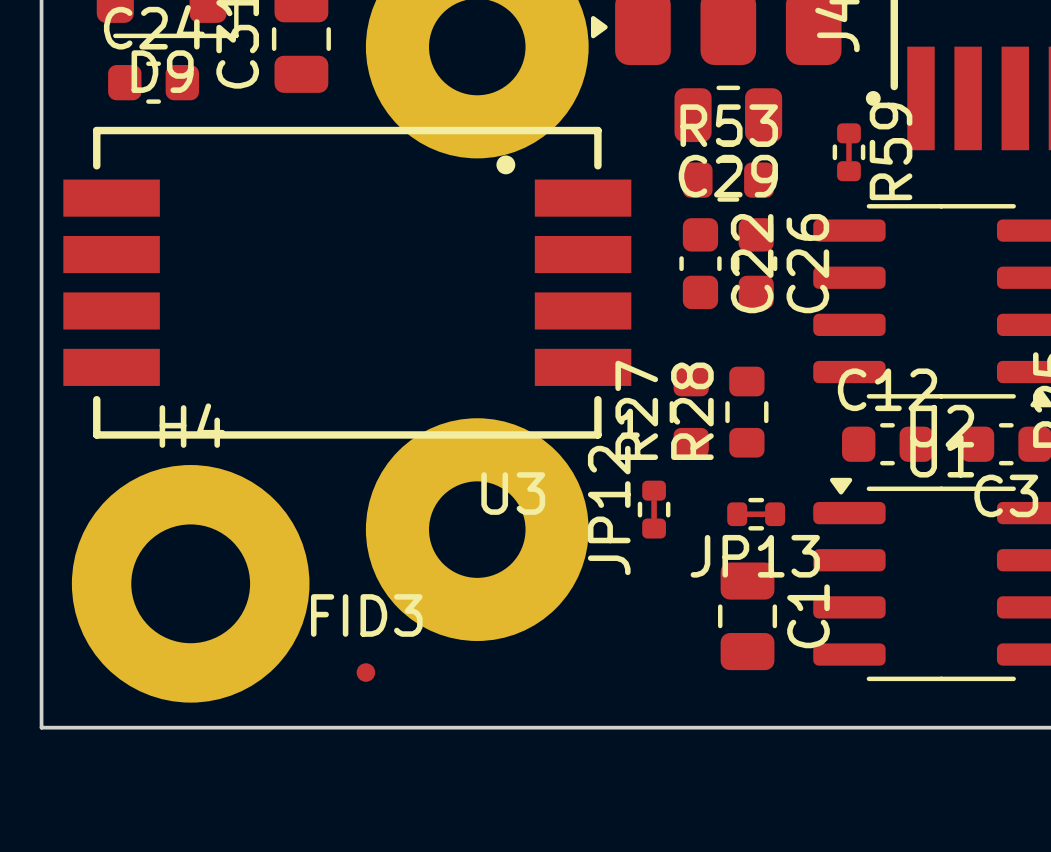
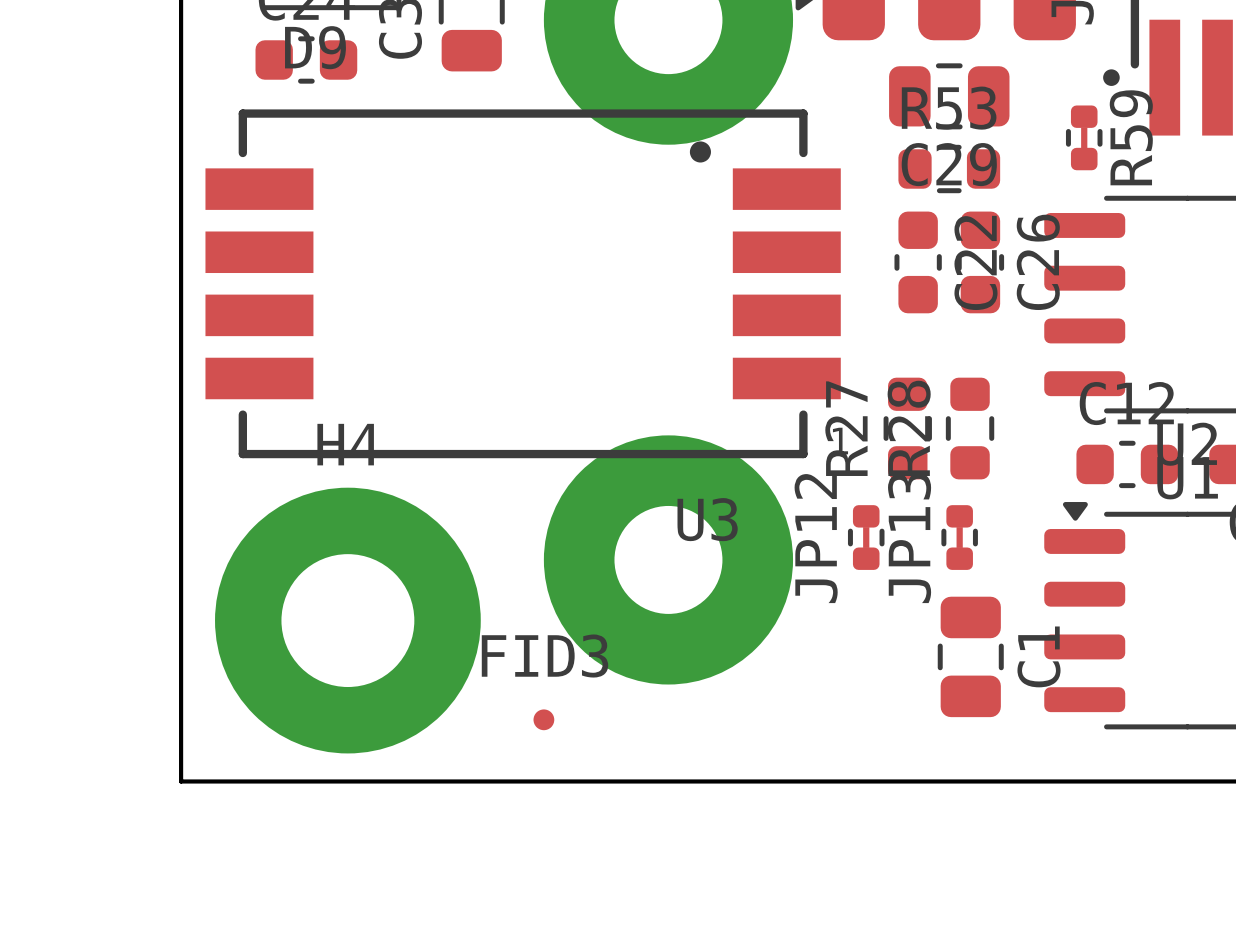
JP13 rotation: 0° (756, 514) -> 90° clockwise (959, 537)

